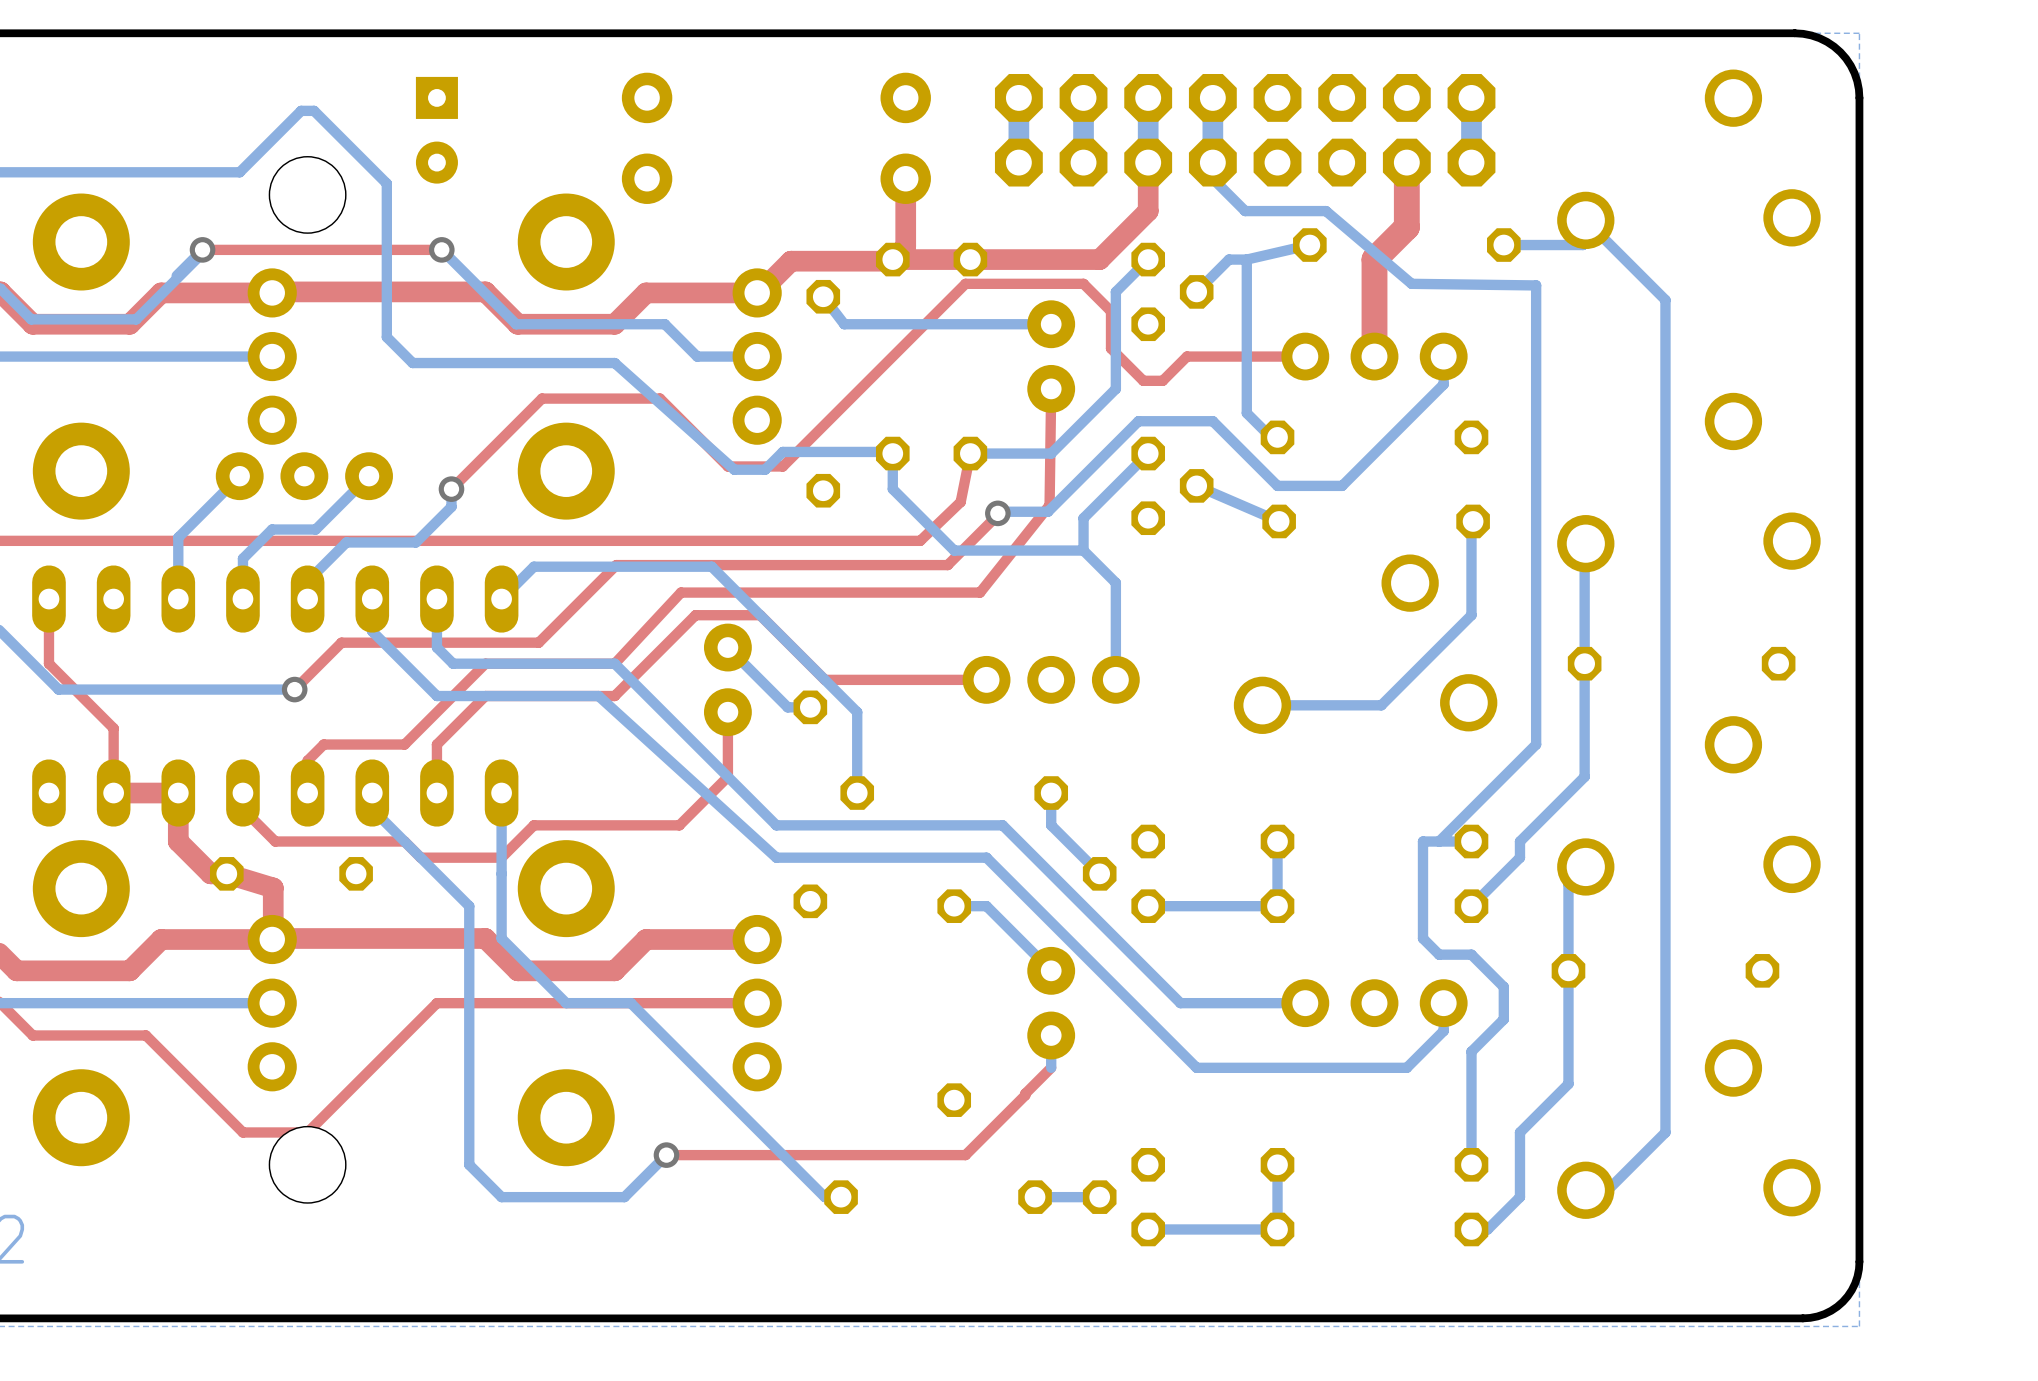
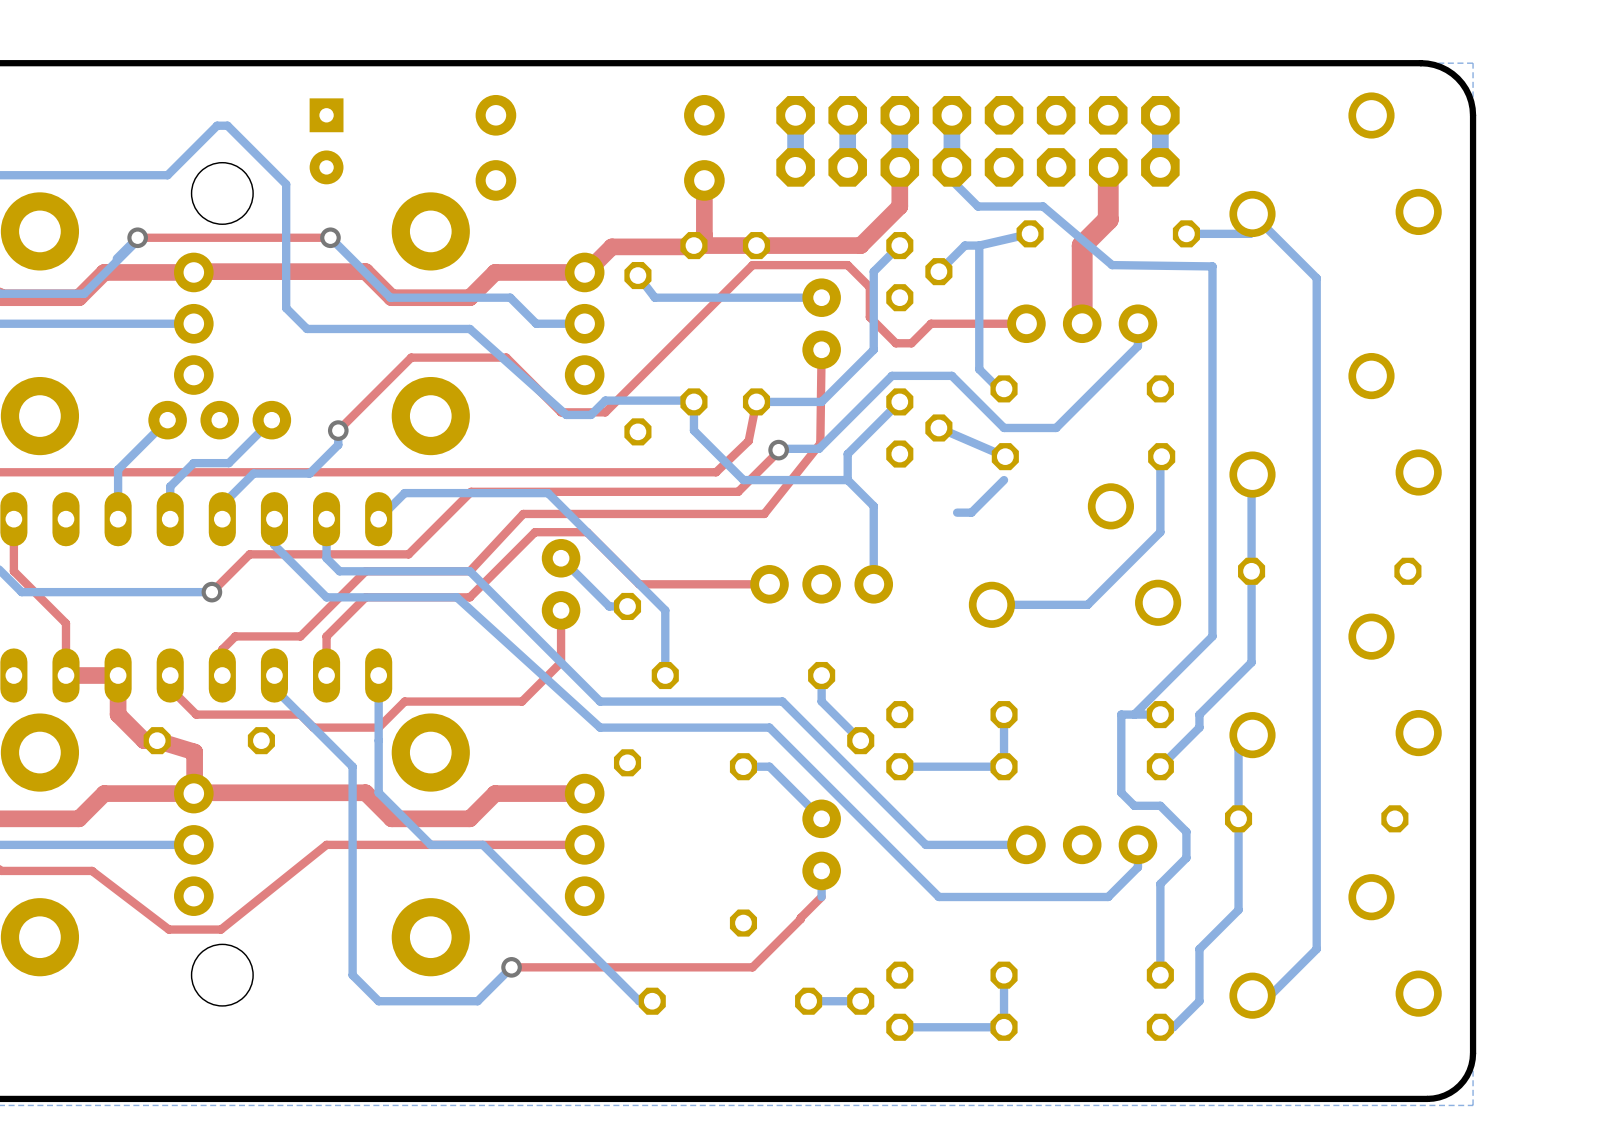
bottom track: none -> (1004, 480) (971, 512) (957, 512)
top track: (436, 1003) (307, 1132) (242, 1132) (145, 1035) -> (326, 844) (221, 929) (168, 929) (92, 870)

